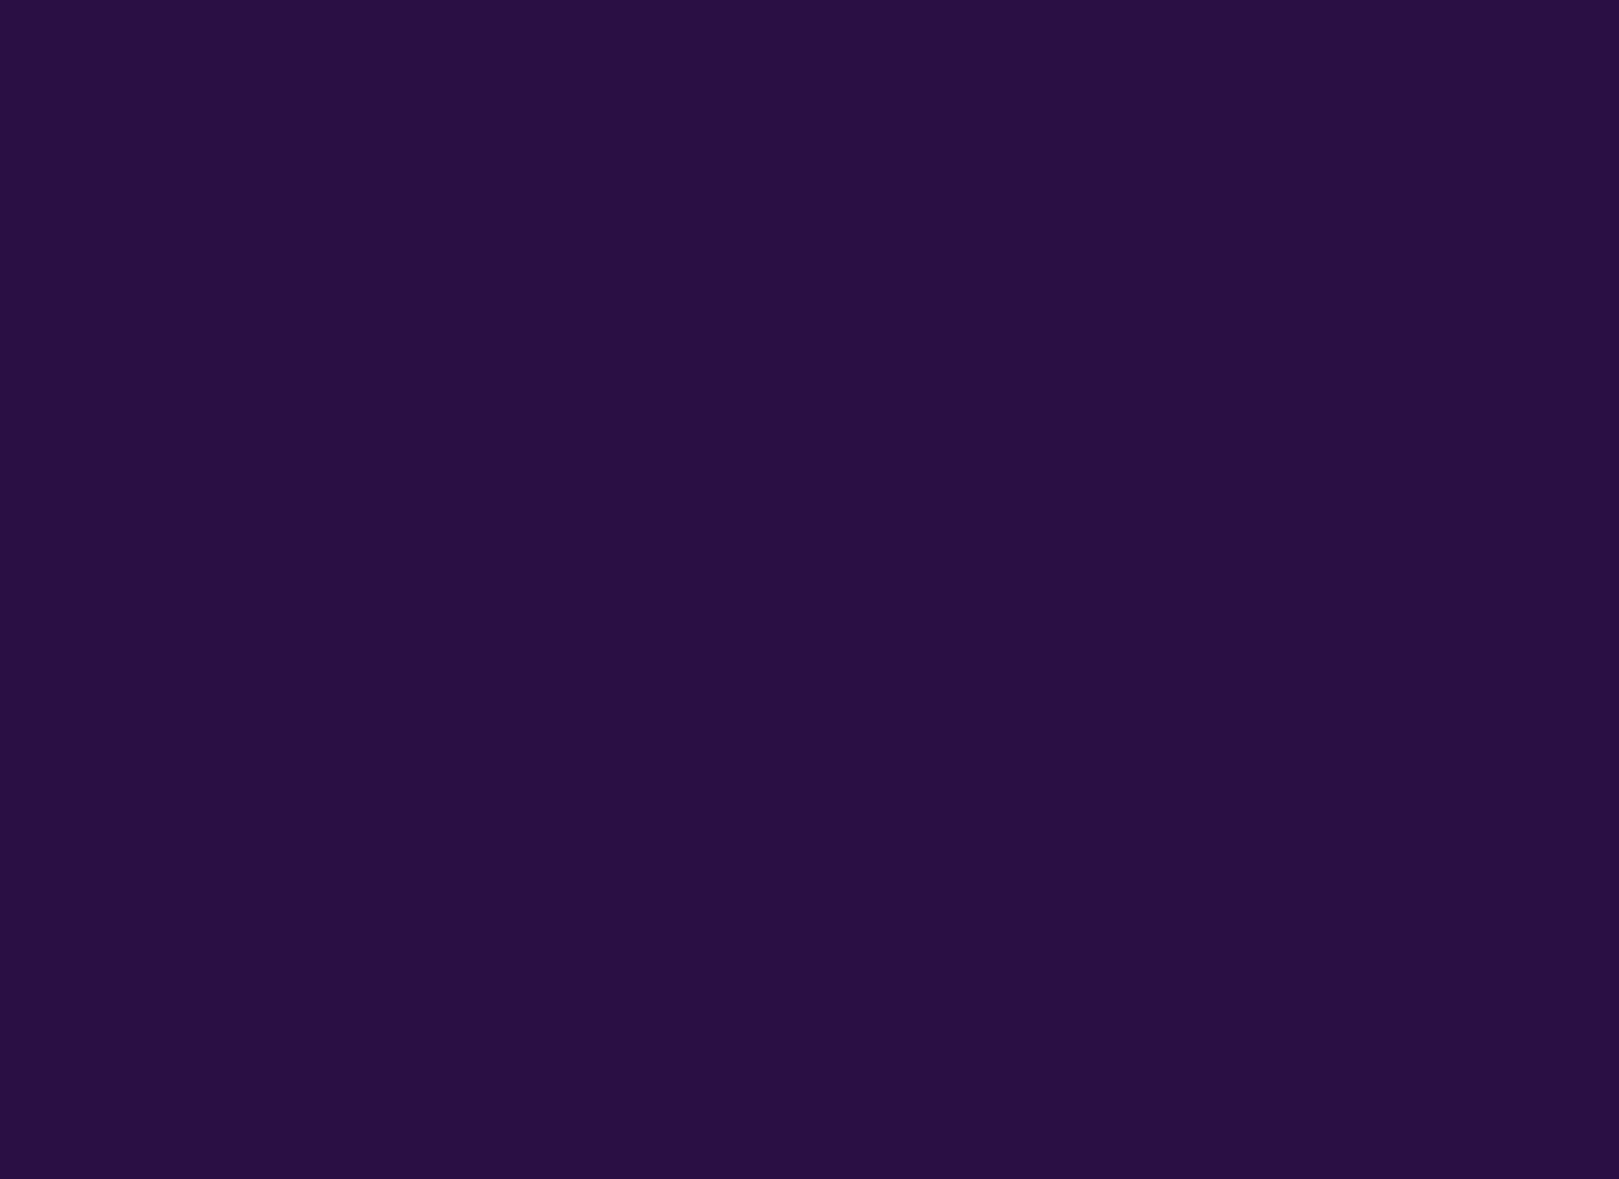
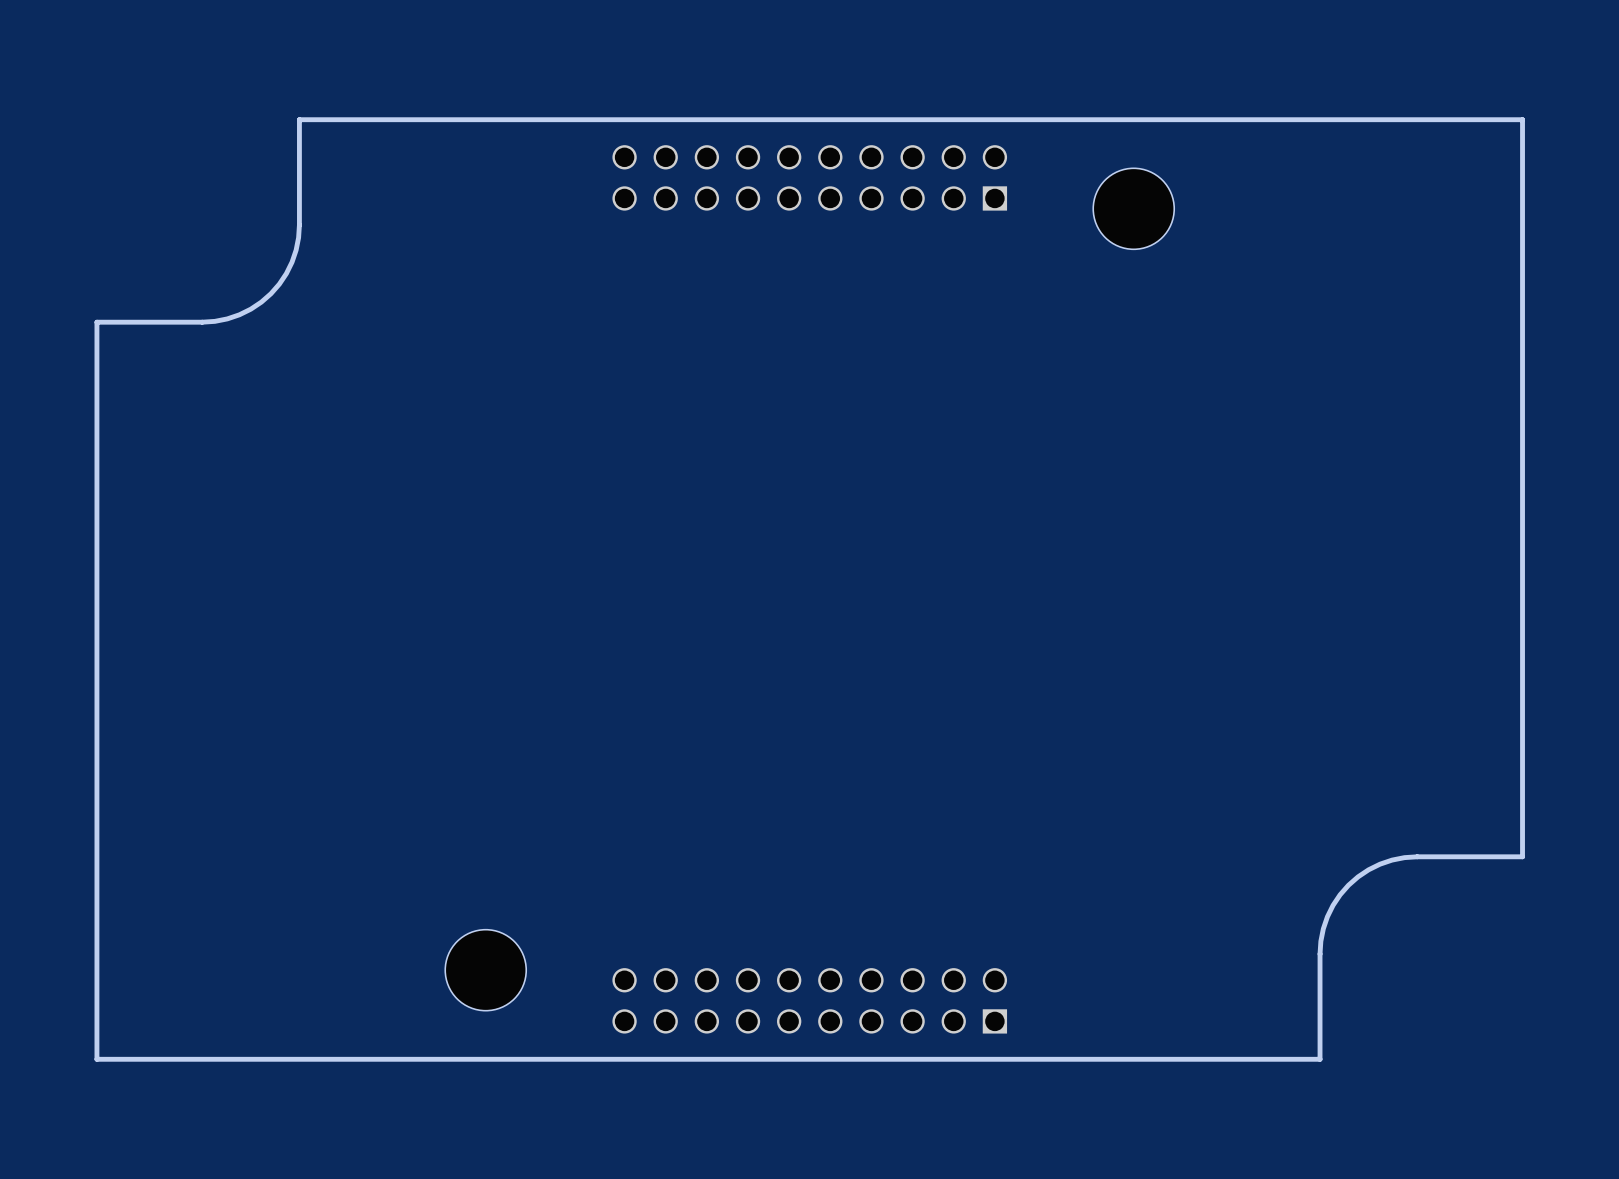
board edge: none -> (1522, 119) (1522, 856) (1404, 857) (1392, 860) (1368, 869) (1348, 885) (1333, 905) (1323, 928) (1320, 941) (1320, 1059) (96, 1059) (96, 322) (214, 321) (227, 318) (250, 309) (270, 293) (286, 273) (296, 250) (298, 237) (299, 119) (1522, 119)
part: none -> (809, 177)
part: none -> (1133, 208)
part: none -> (485, 970)
part: none -> (809, 1000)

